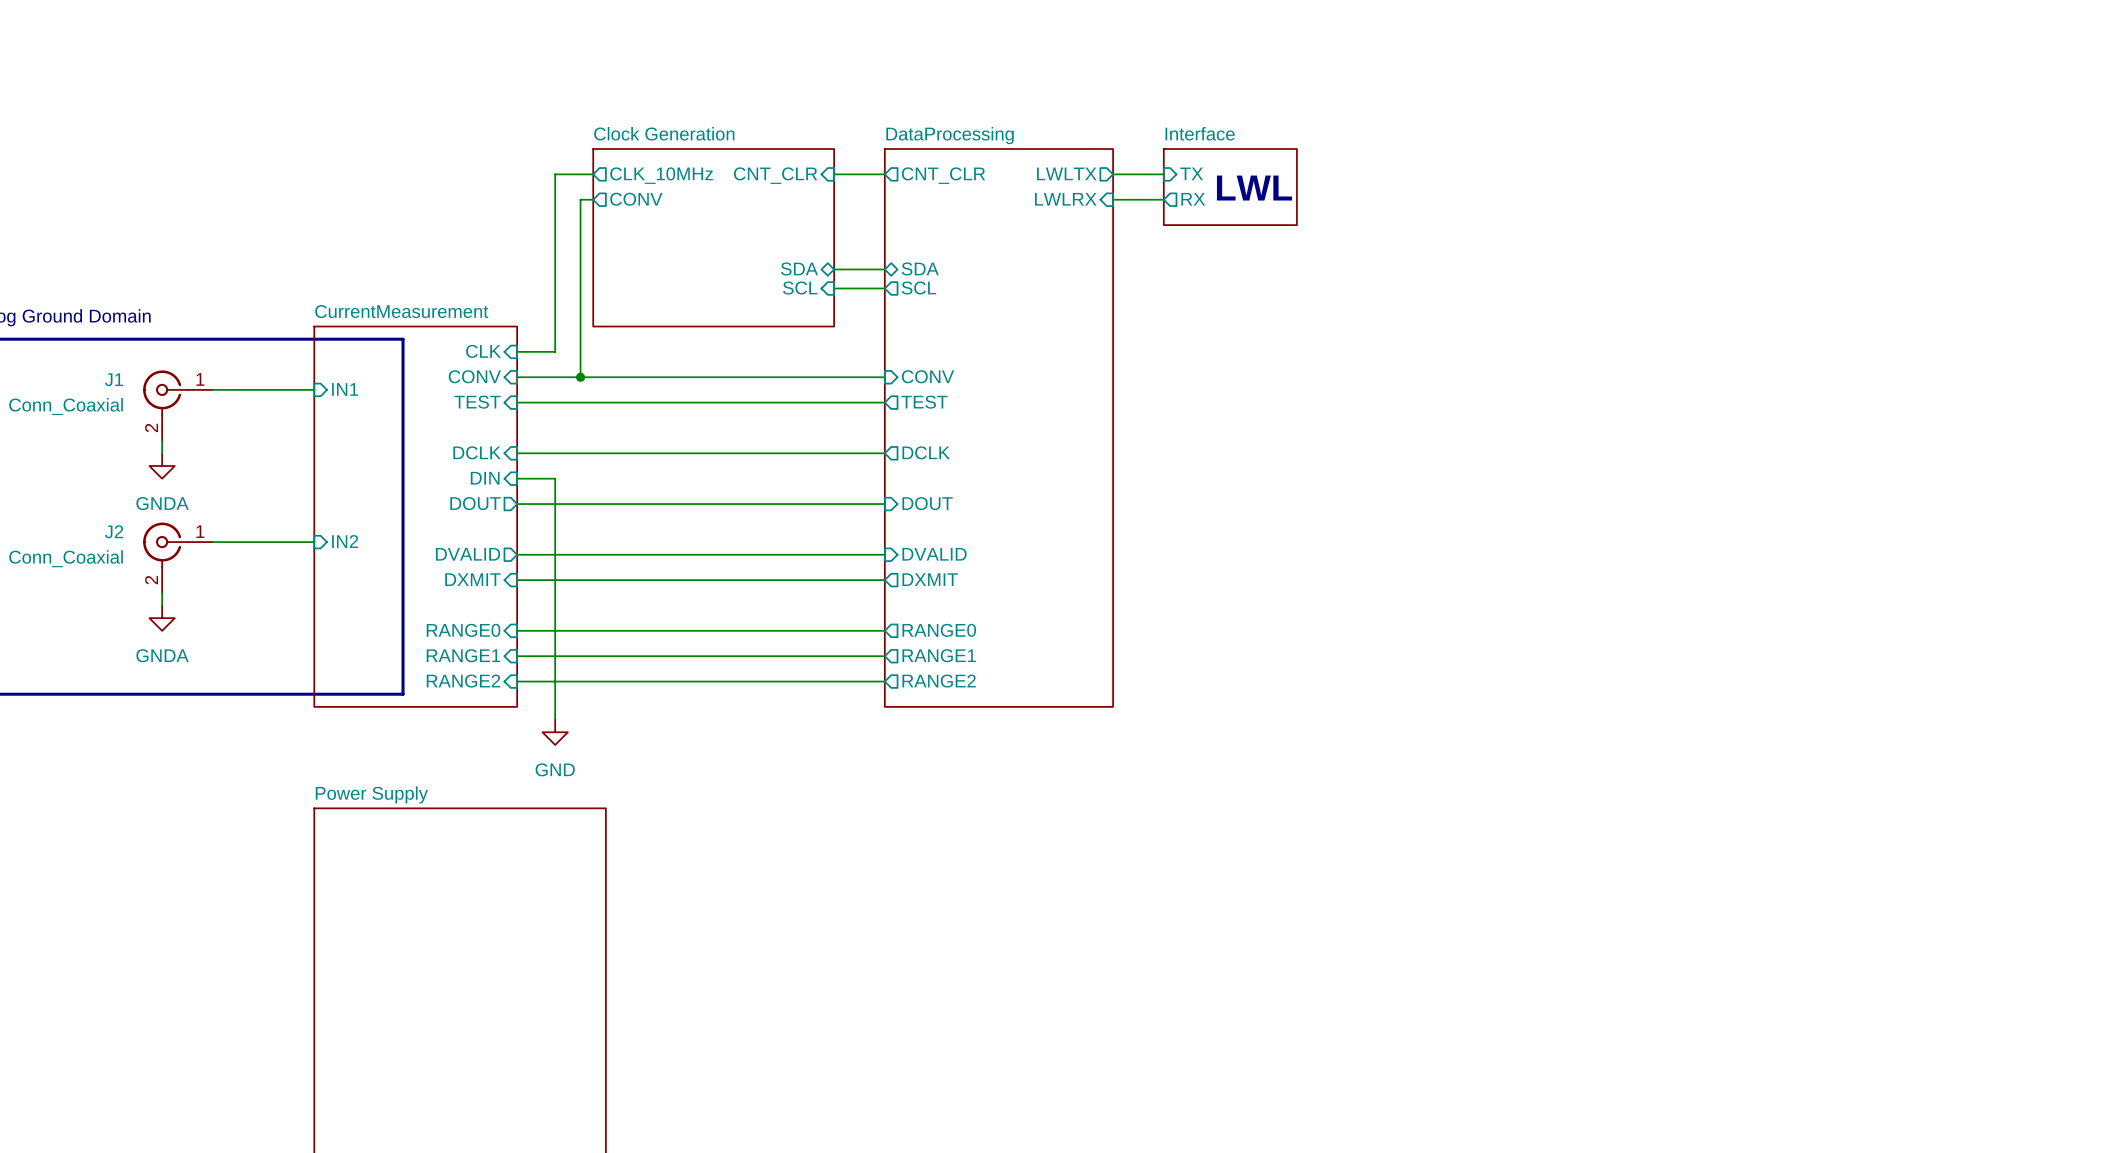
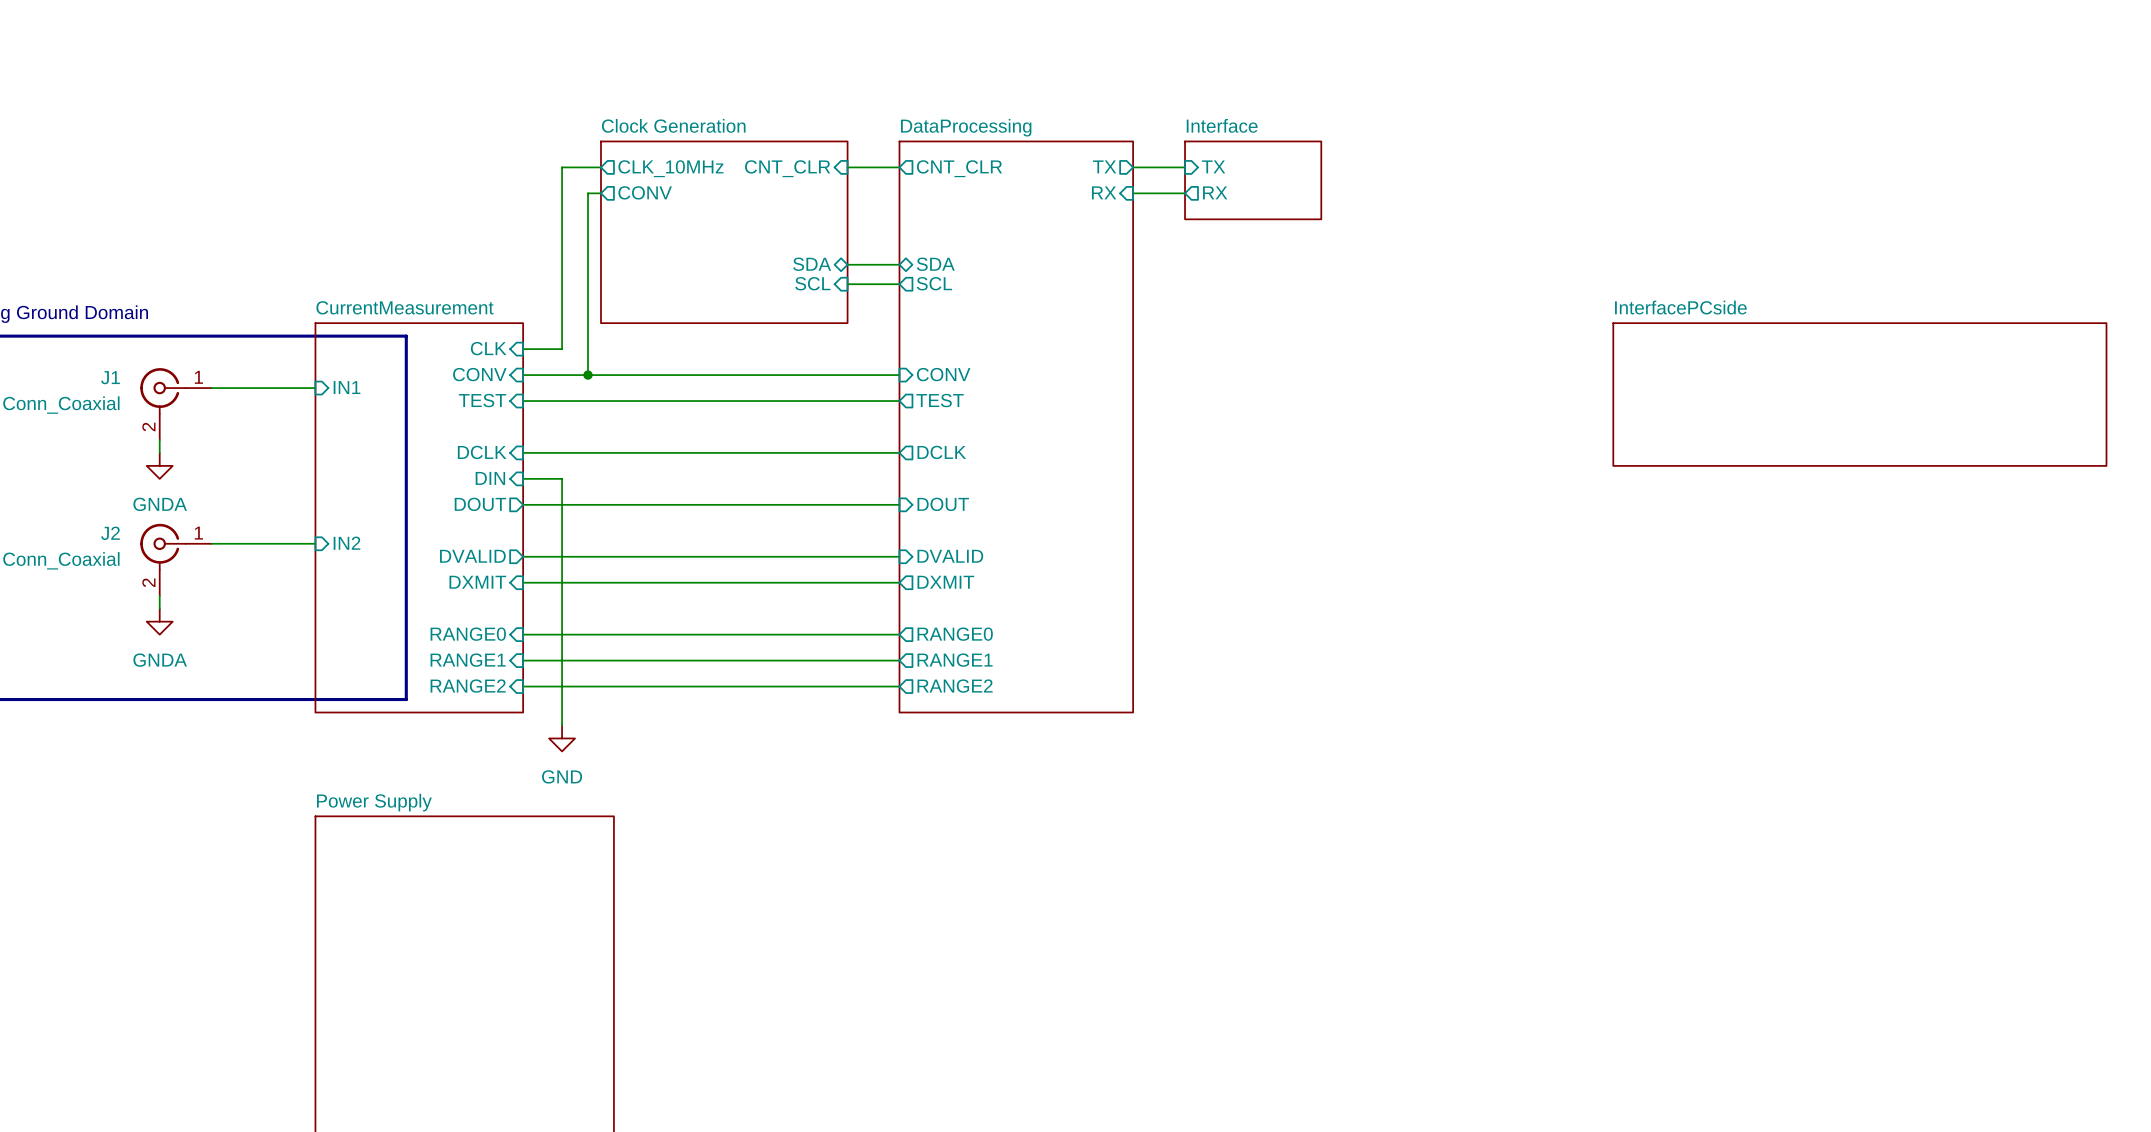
sheet pin: LWLTX (1066, 173) -> TX (1104, 166)
text: LWL (1254, 188) -> none
sheet pin: LWLRX (1065, 199) -> RX (1104, 192)
sheet InterfacePCside: none -> (1859, 394)

